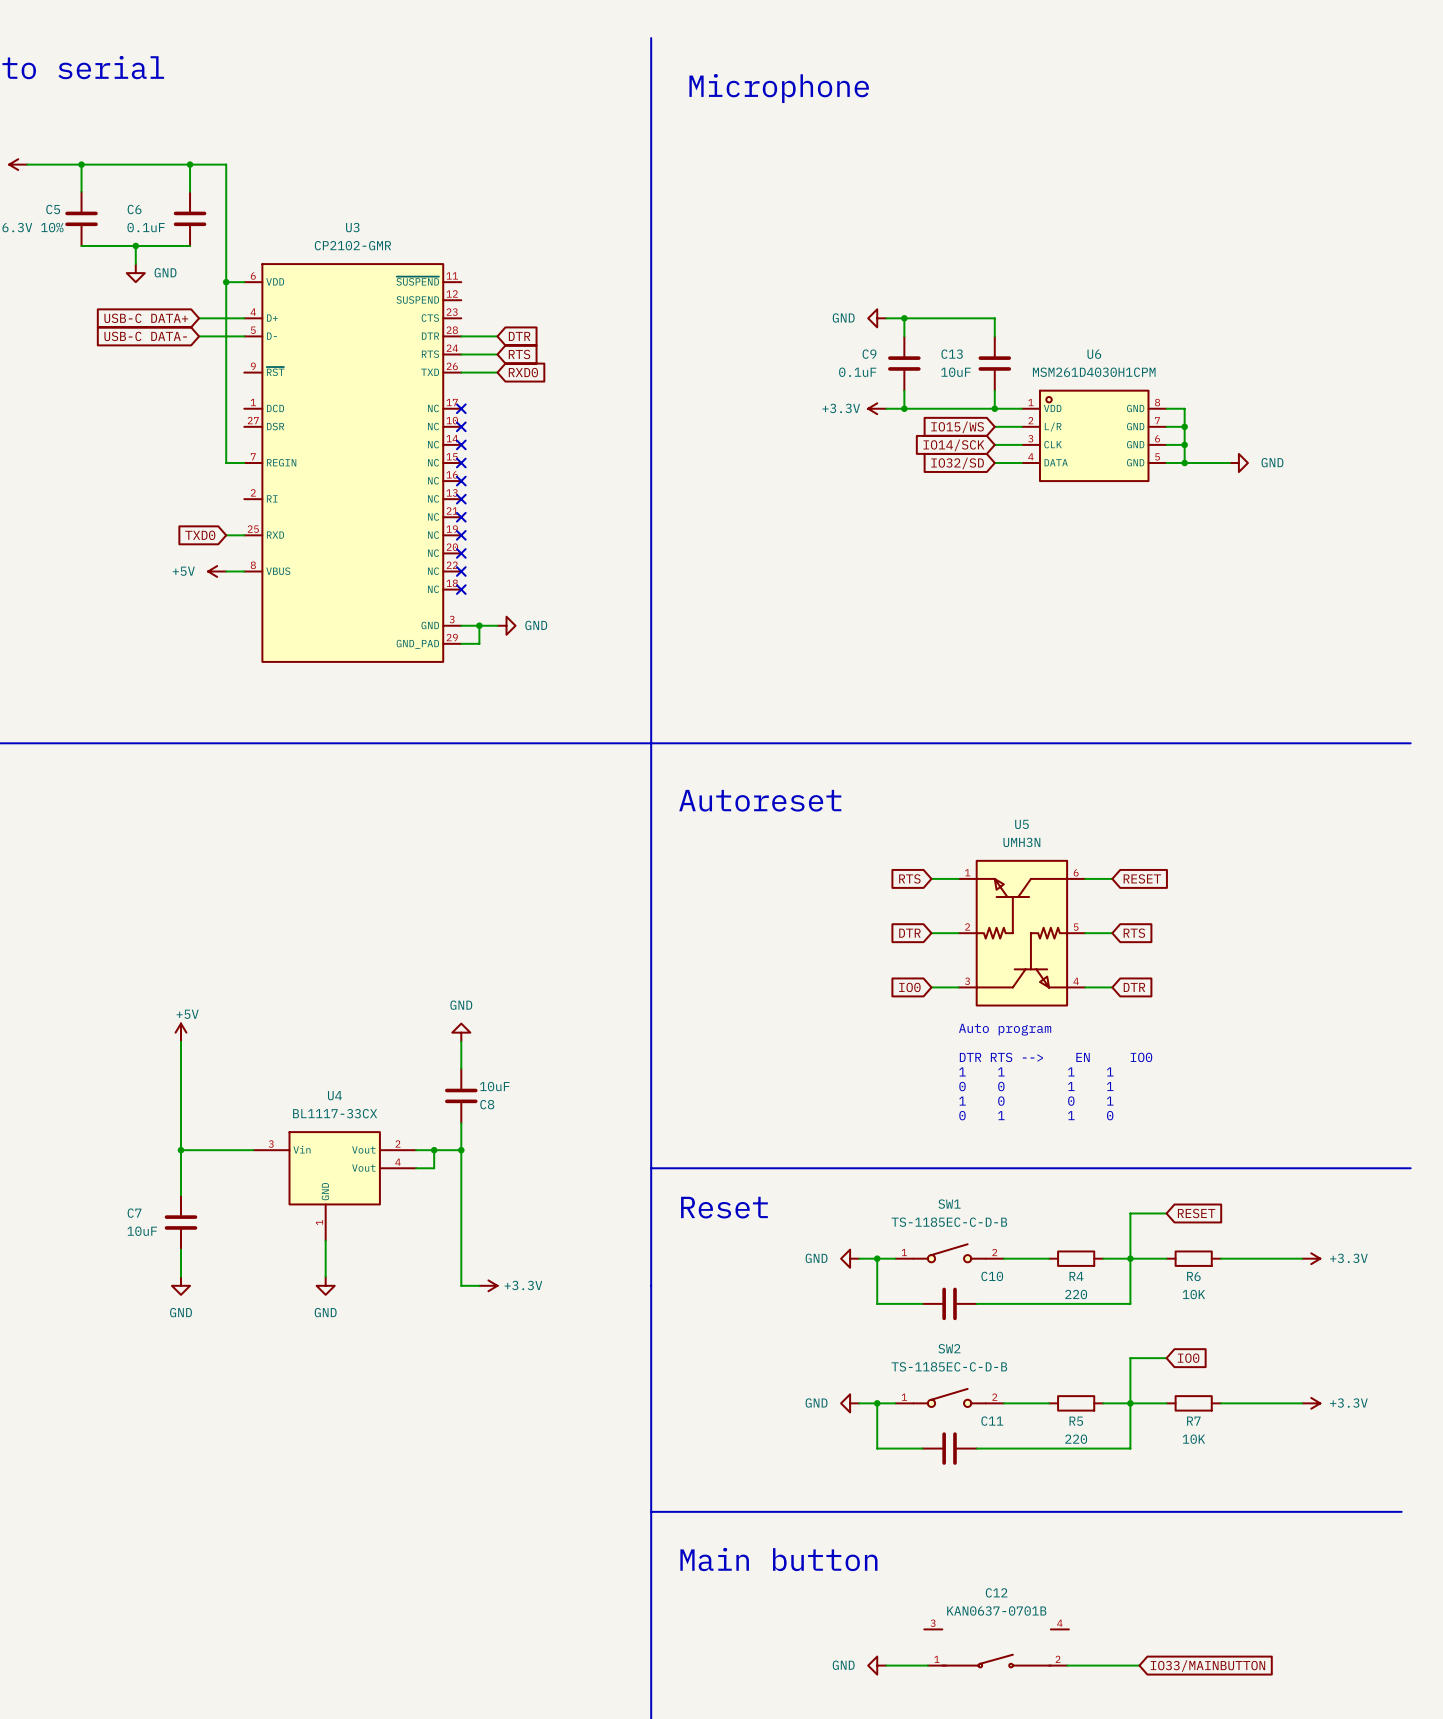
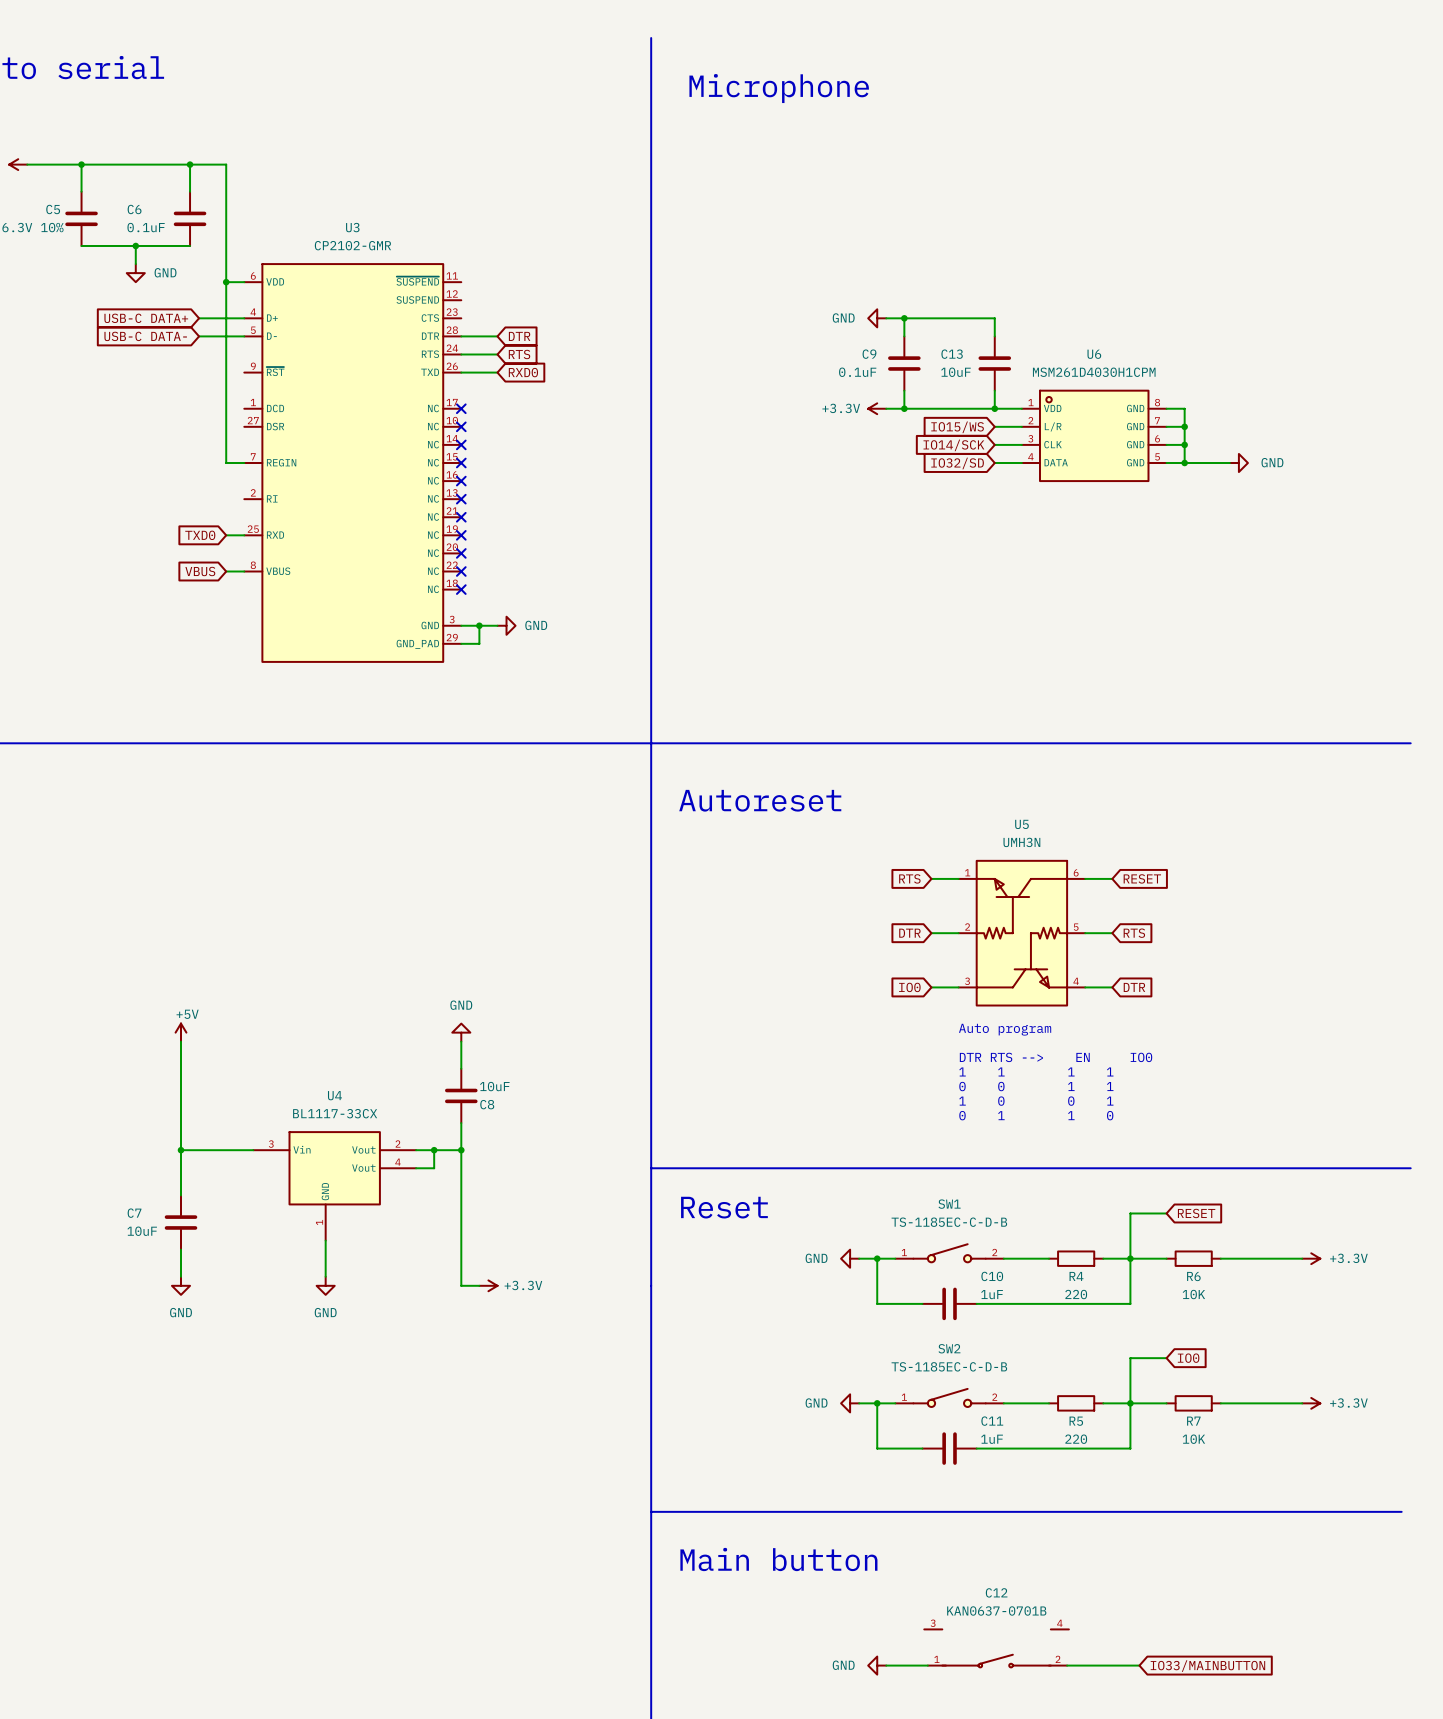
global label: none -> VBUS (200, 571)
power symbol: +5V (217, 571) -> none
C10 value: none -> 1uF (992, 1294)
C11 value: none -> 1uF (992, 1439)

